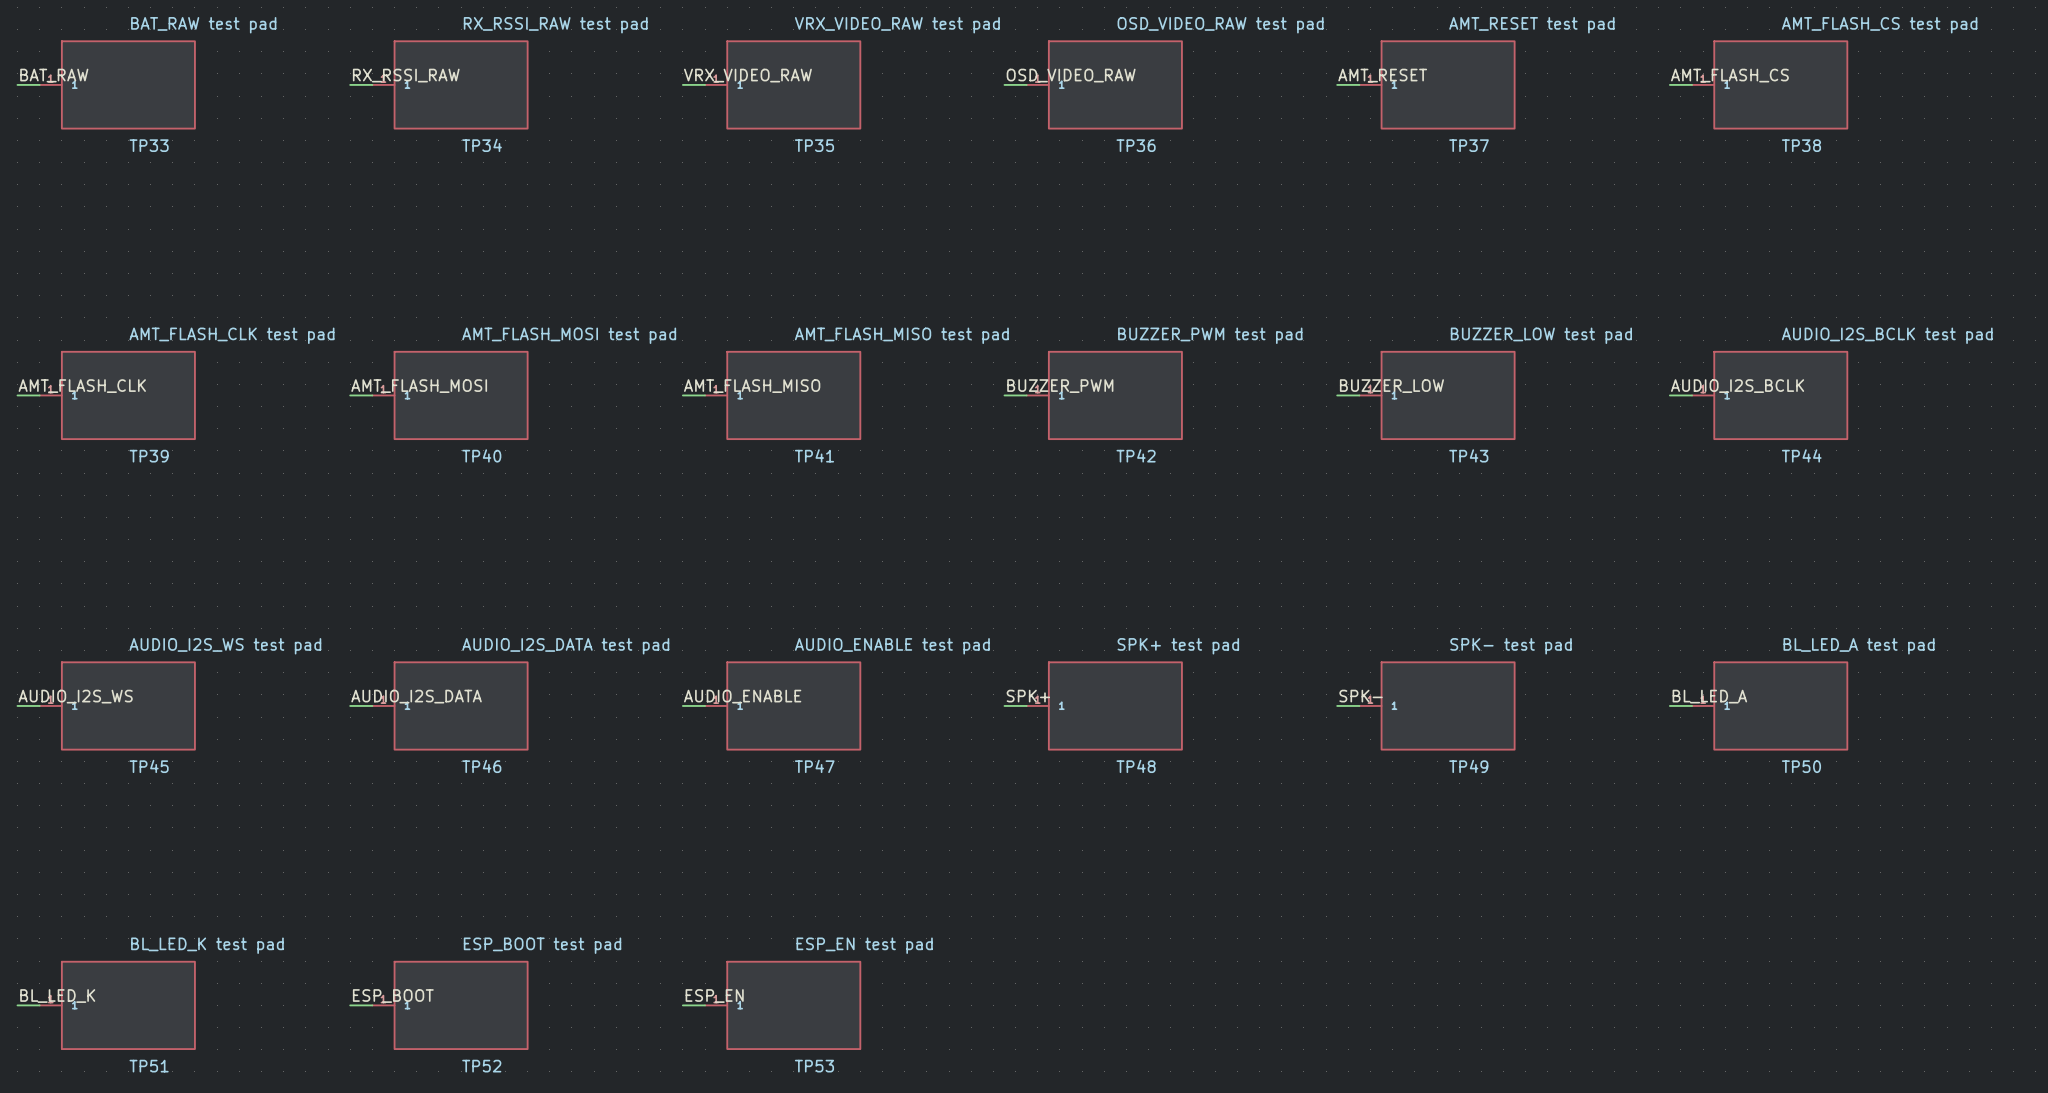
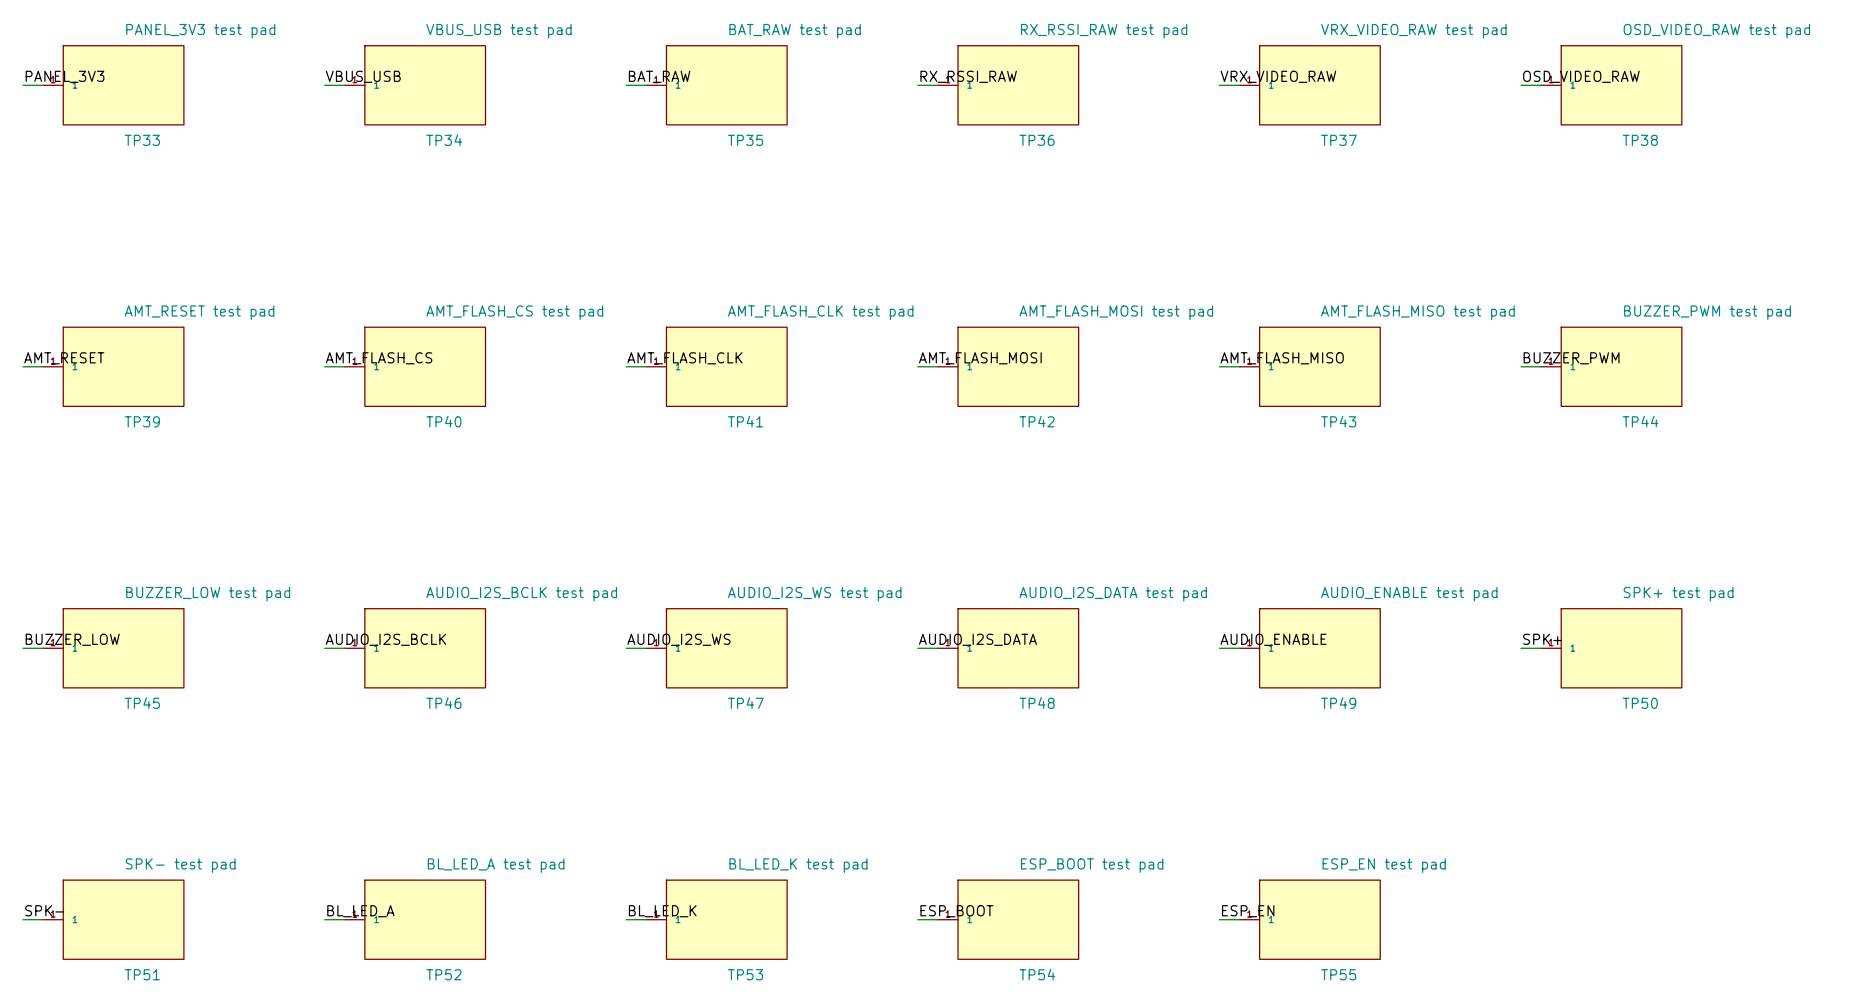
TP33 value: BAT_RAW test pad (203, 25) -> PANEL_3V3 test pad (200, 31)
TP34 value: RX_RSSI_RAW test pad (555, 25) -> VBUS_USB test pad (498, 31)
TP35 value: VRX_VIDEO_RAW test pad (897, 25) -> BAT_RAW test pad (795, 31)
TP36 value: OSD_VIDEO_RAW test pad (1220, 25) -> RX_RSSI_RAW test pad (1104, 31)
TP37 value: AMT_RESET test pad (1531, 25) -> VRX_VIDEO_RAW test pad (1413, 31)
TP38 value: AMT_FLASH_CS test pad (1879, 25) -> OSD_VIDEO_RAW test pad (1716, 31)
label: BAT_RAW (54, 75) -> PANEL_3V3 (65, 76)
label: RX_RSSI_RAW (406, 75) -> VBUS_USB (363, 76)
label: VRX_VIDEO_RAW (747, 75) -> BAT_RAW (659, 76)
label: OSD_VIDEO_RAW (1071, 75) -> RX_RSSI_RAW (968, 76)
label: AMT_RESET (1382, 75) -> VRX_VIDEO_RAW (1278, 76)
label: AMT_FLASH_CS (1729, 75) -> OSD_VIDEO_RAW (1581, 76)
TP39 value: AMT_FLASH_CLK test pad (231, 335) -> AMT_RESET test pad (199, 312)
TP40 value: AMT_FLASH_MOSI test pad (569, 335) -> AMT_FLASH_CS test pad (514, 312)
TP41 value: AMT_FLASH_MISO test pad (901, 335) -> AMT_FLASH_CLK test pad (820, 312)
TP42 value: BUZZER_PWM test pad (1210, 335) -> AMT_FLASH_MOSI test pad (1116, 312)
TP43 value: BUZZER_LOW test pad (1541, 335) -> AMT_FLASH_MISO test pad (1417, 312)
TP44 value: AUDIO_I2S_BCLK test pad (1887, 335) -> BUZZER_PWM test pad (1707, 312)
label: AMT_FLASH_CLK (82, 386) -> AMT_RESET (64, 358)
label: AMT_FLASH_MOSI (419, 386) -> AMT_FLASH_CS (379, 358)
label: AMT_FLASH_MISO (752, 386) -> AMT_FLASH_CLK (684, 358)
label: BUZZER_PWM (1060, 386) -> AMT_FLASH_MOSI (980, 358)
label: BUZZER_LOW (1391, 386) -> AMT_FLASH_MISO (1282, 358)
label: AUDIO_I2S_BCLK (1737, 386) -> BUZZER_PWM (1571, 358)
TP45 value: AUDIO_I2S_WS test pad (225, 646) -> BUZZER_LOW test pad (208, 594)
TP46 value: AUDIO_I2S_DATA test pad (565, 646) -> AUDIO_I2S_BCLK test pad (521, 594)
TP47 value: AUDIO_ENABLE test pad (892, 646) -> AUDIO_I2S_WS test pad (814, 594)
TP48 value: SPK+ test pad (1178, 646) -> AUDIO_I2S_DATA test pad (1113, 594)
TP49 value: SPK- test pad (1511, 646) -> AUDIO_ENABLE test pad (1409, 594)
TP50 value: BL_LED_A test pad (1859, 646) -> SPK+ test pad (1678, 594)
label: AUDIO_I2S_WS (75, 696) -> BUZZER_LOW (72, 639)
label: AUDIO_I2S_DATA (416, 696) -> AUDIO_I2S_BCLK (386, 639)
label: AUDIO_ENABLE (742, 696) -> AUDIO_I2S_WS (678, 639)
label: SPK+ (1028, 696) -> AUDIO_I2S_DATA (977, 639)
label: SPK- (1361, 696) -> AUDIO_ENABLE (1273, 639)
label: BL_LED_A (1709, 696) -> SPK+ (1542, 639)
TP51 value: BL_LED_K test pad (207, 945) -> SPK- test pad (180, 865)
TP52 value: ESP_BOOT test pad (542, 945) -> BL_LED_A test pad (496, 865)
TP53 value: ESP_EN test pad (864, 945) -> BL_LED_K test pad (798, 865)
label: BL_LED_K (57, 996) -> SPK- (44, 910)
label: ESP_BOOT (393, 996) -> BL_LED_A (360, 911)
label: ESP_EN (714, 996) -> BL_LED_K (662, 911)
label: none -> ESP_BOOT (956, 911)
label: none -> ESP_EN (1248, 911)
wire: none -> (917, 919) (937, 919)
TP54: none -> ESP_BOOT test pad (1008, 919)
wire: none -> (1219, 919) (1239, 919)
TP55: none -> ESP_EN test pad (1309, 919)

